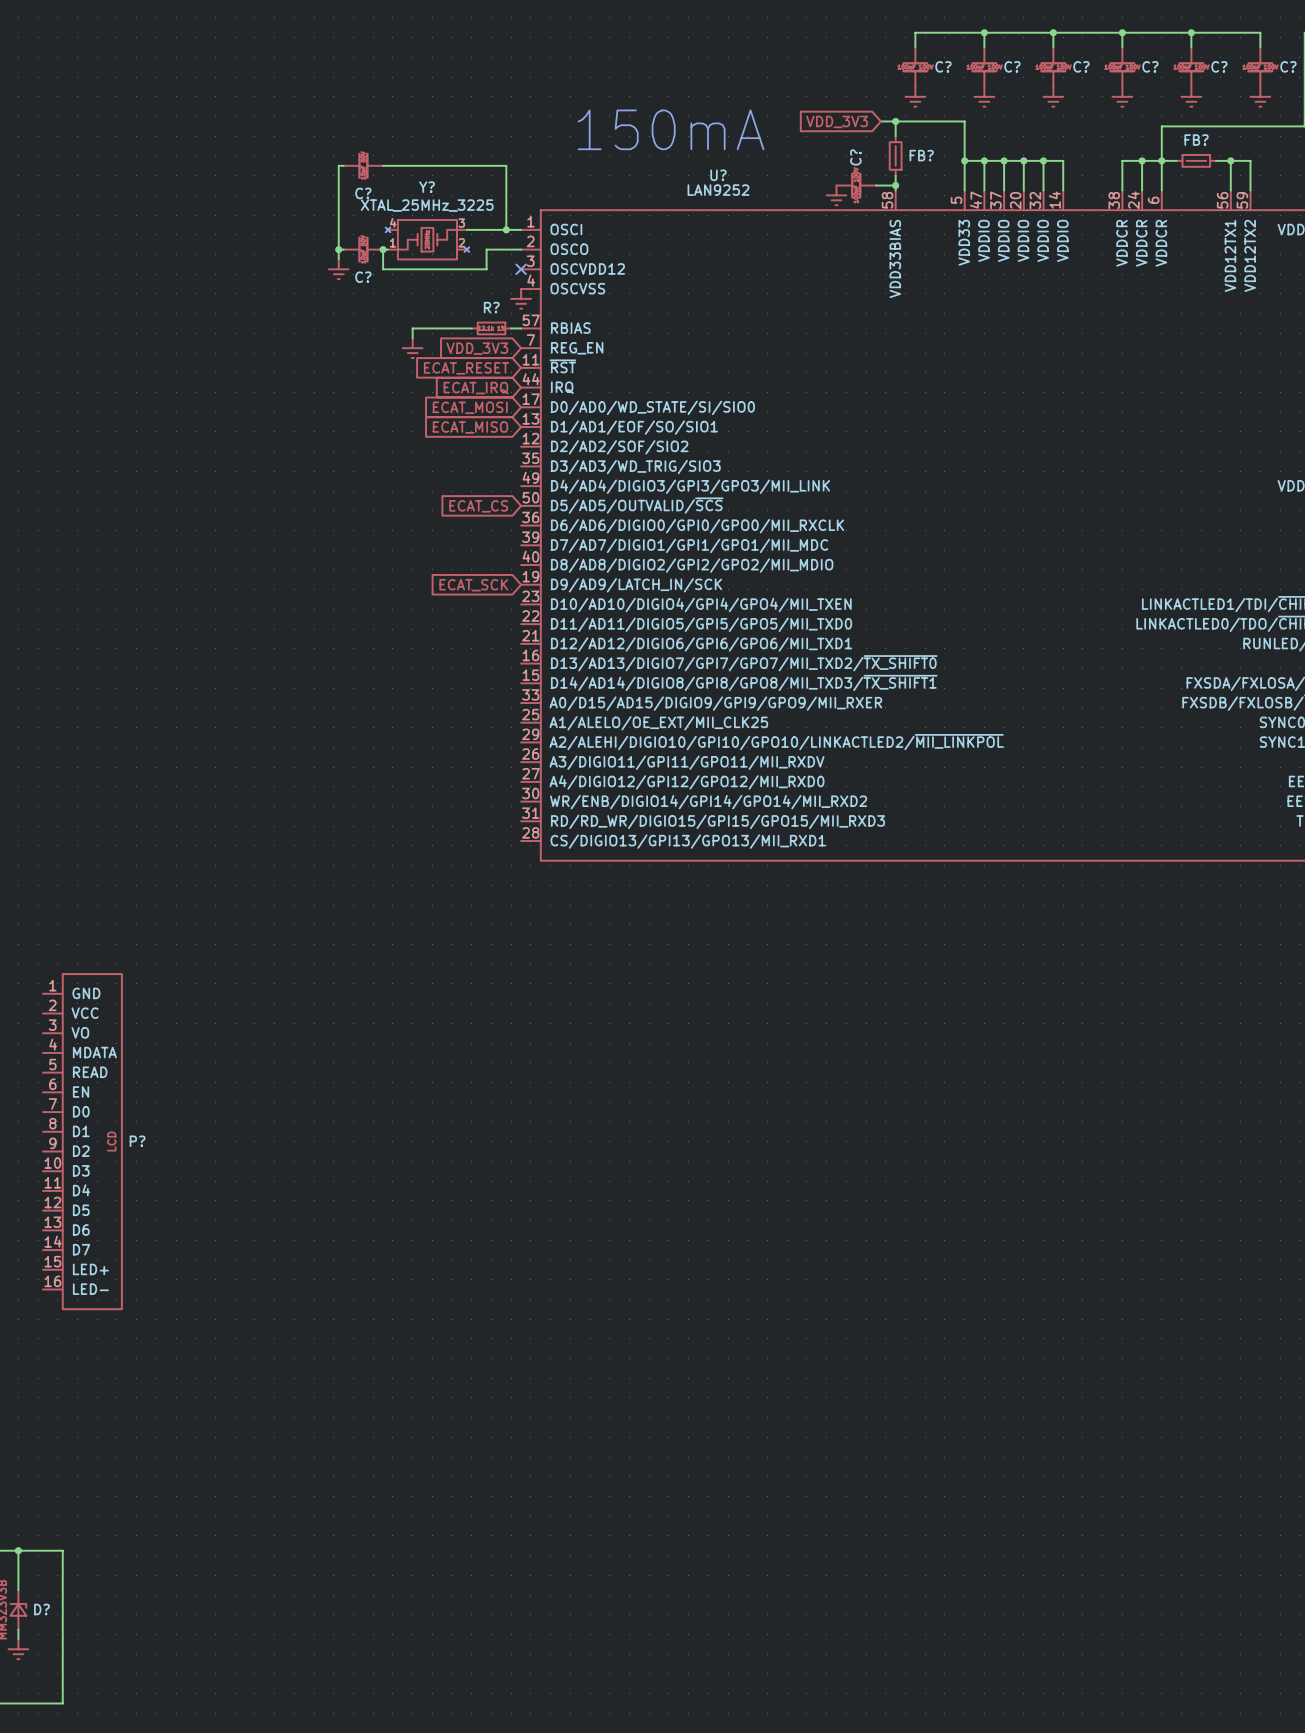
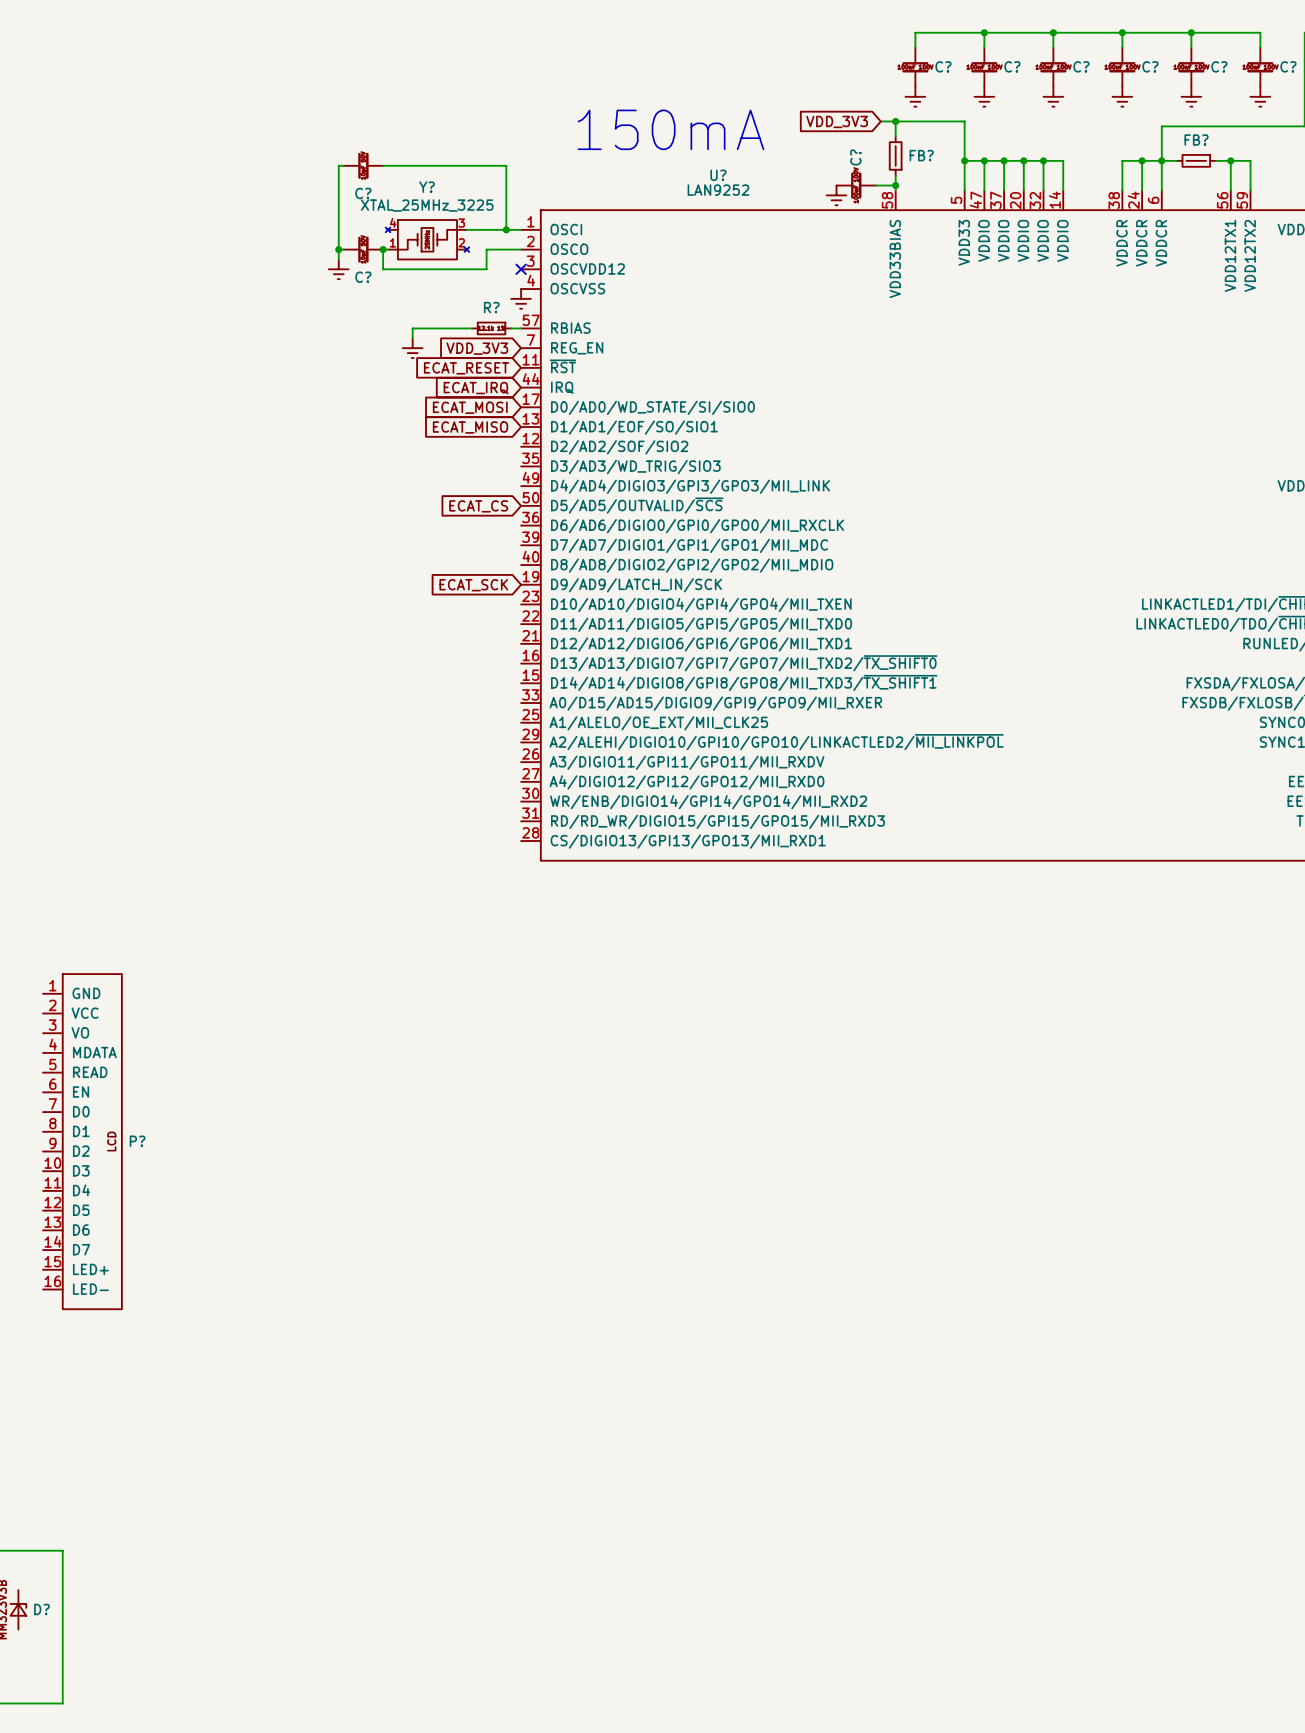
wire: (18, 1550) (18, 1590) -> none
junction: (18, 1550) -> none
wire: (18, 1629) (18, 1639) -> none
power symbol: (18, 1649) -> none

